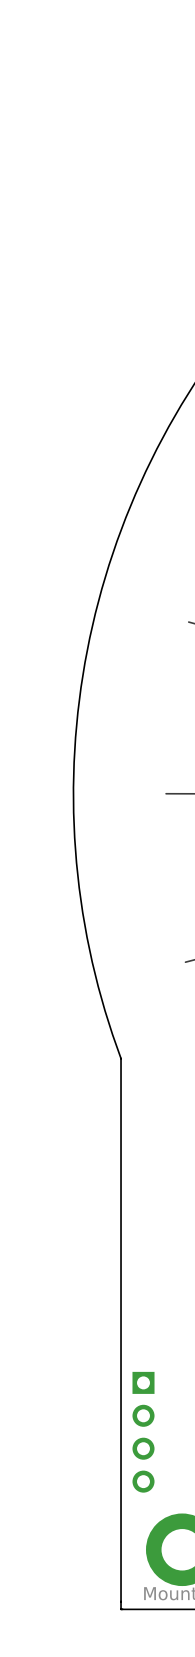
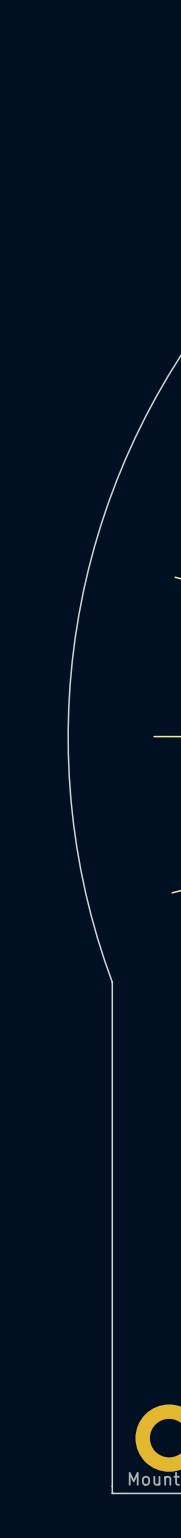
part: (143, 1432) -> none

